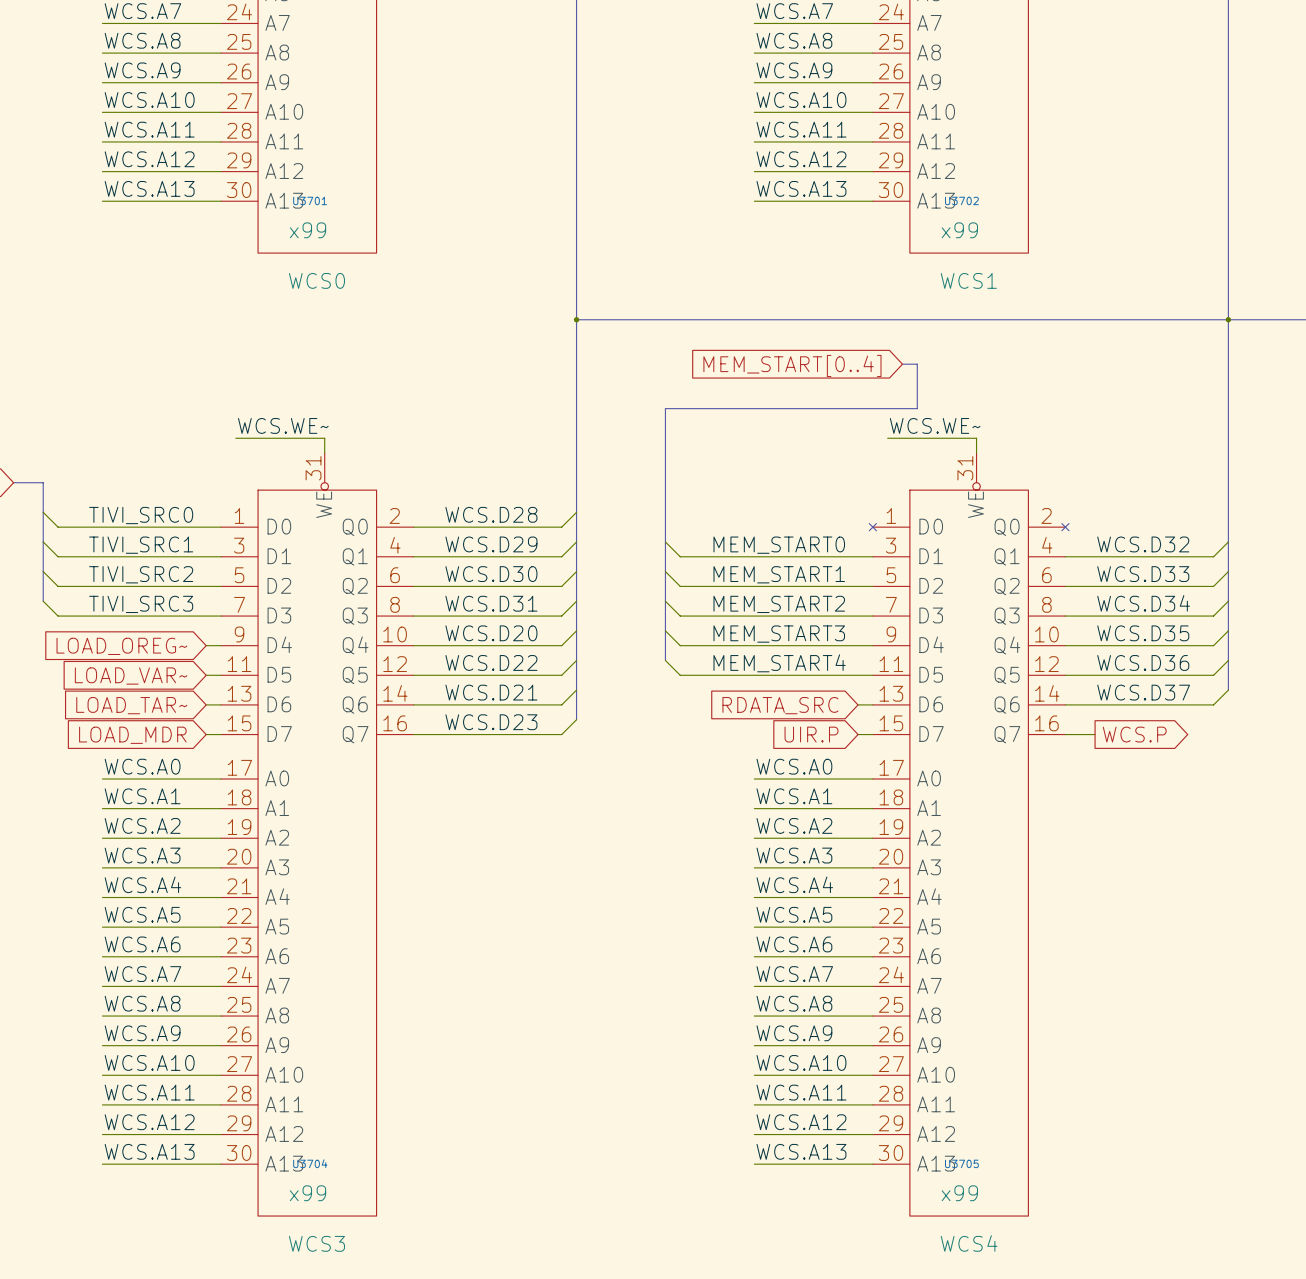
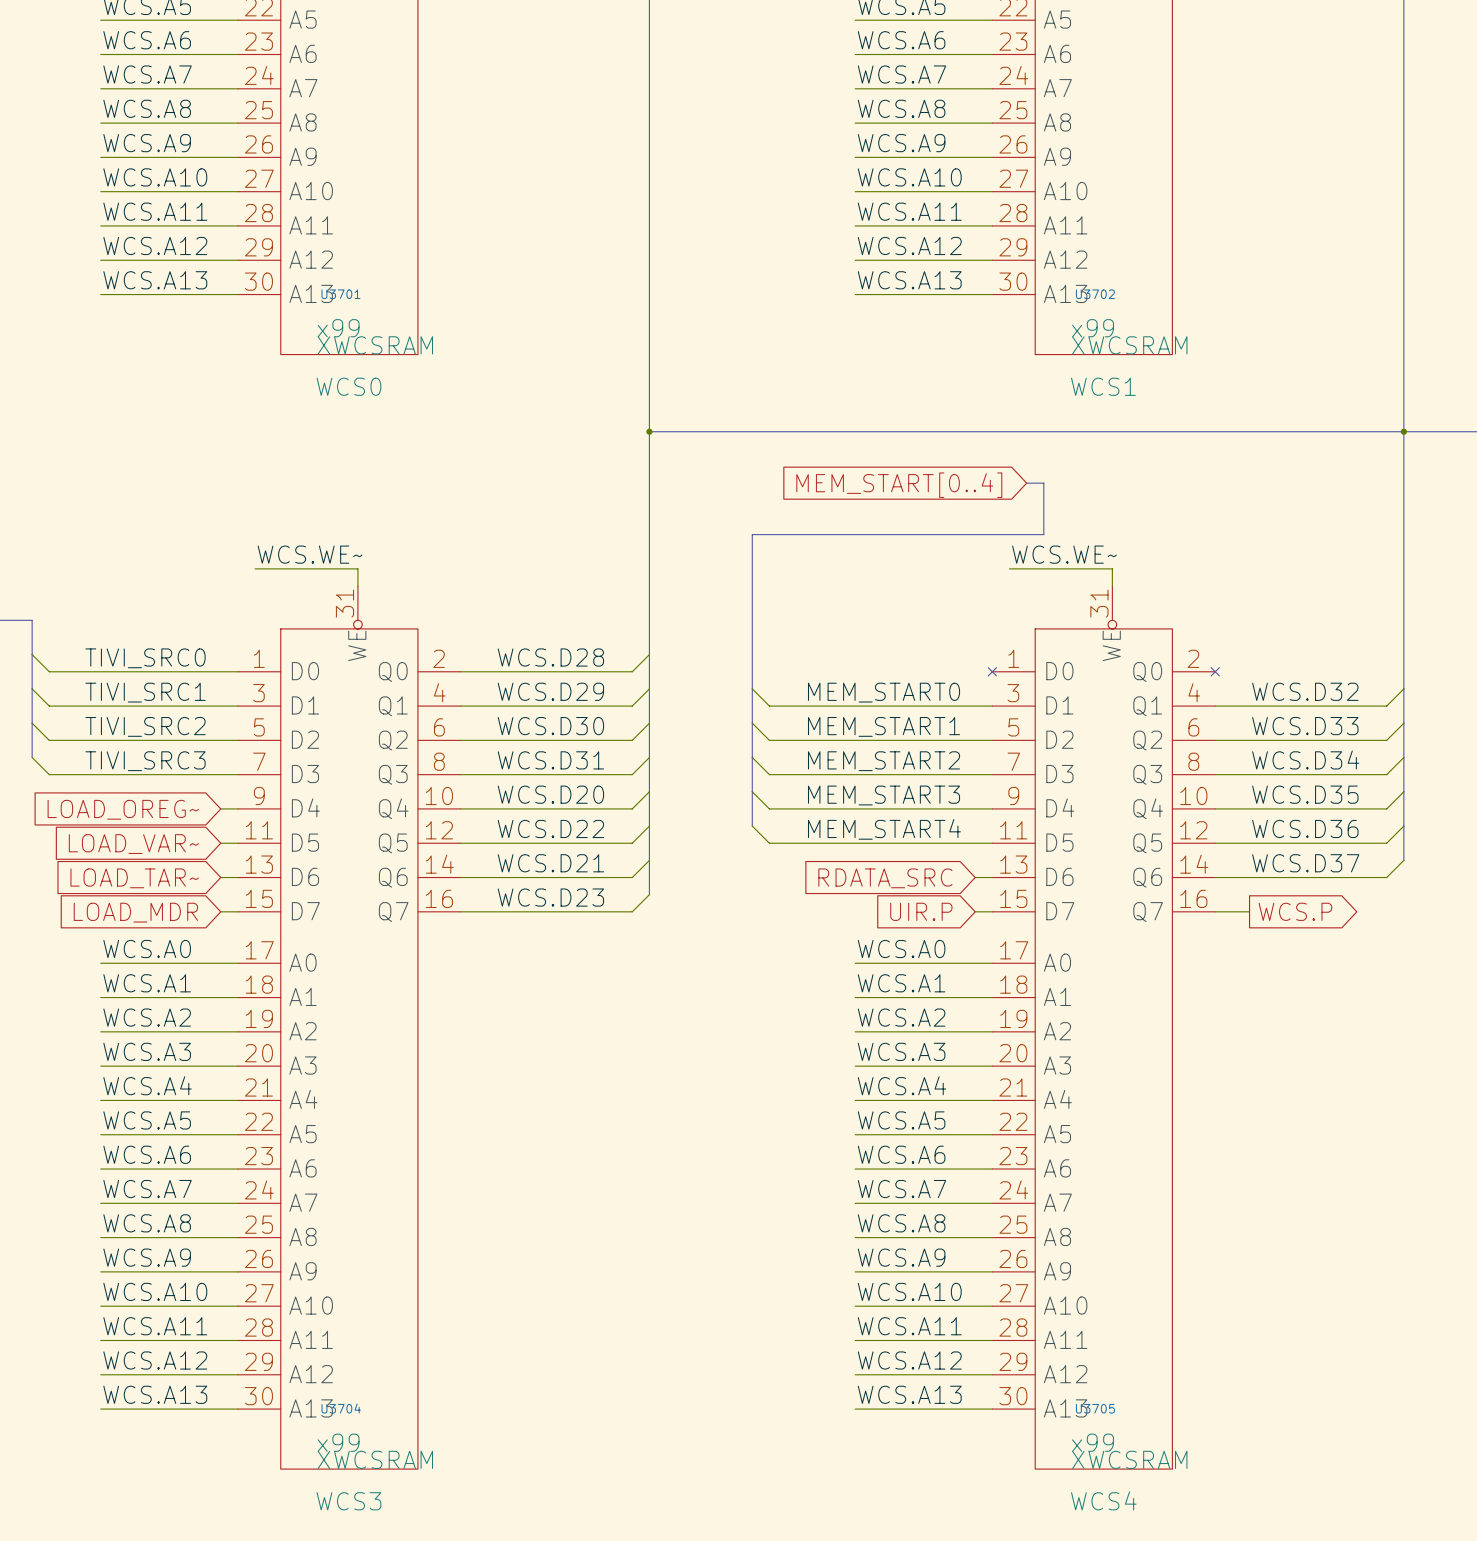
U3701 value: none -> XWCSRAM (375, 345)
U3702 value: none -> XWCSRAM (1129, 345)
U3704 value: none -> XWCSRAM (375, 1459)
U3705 value: none -> XWCSRAM (1129, 1459)

